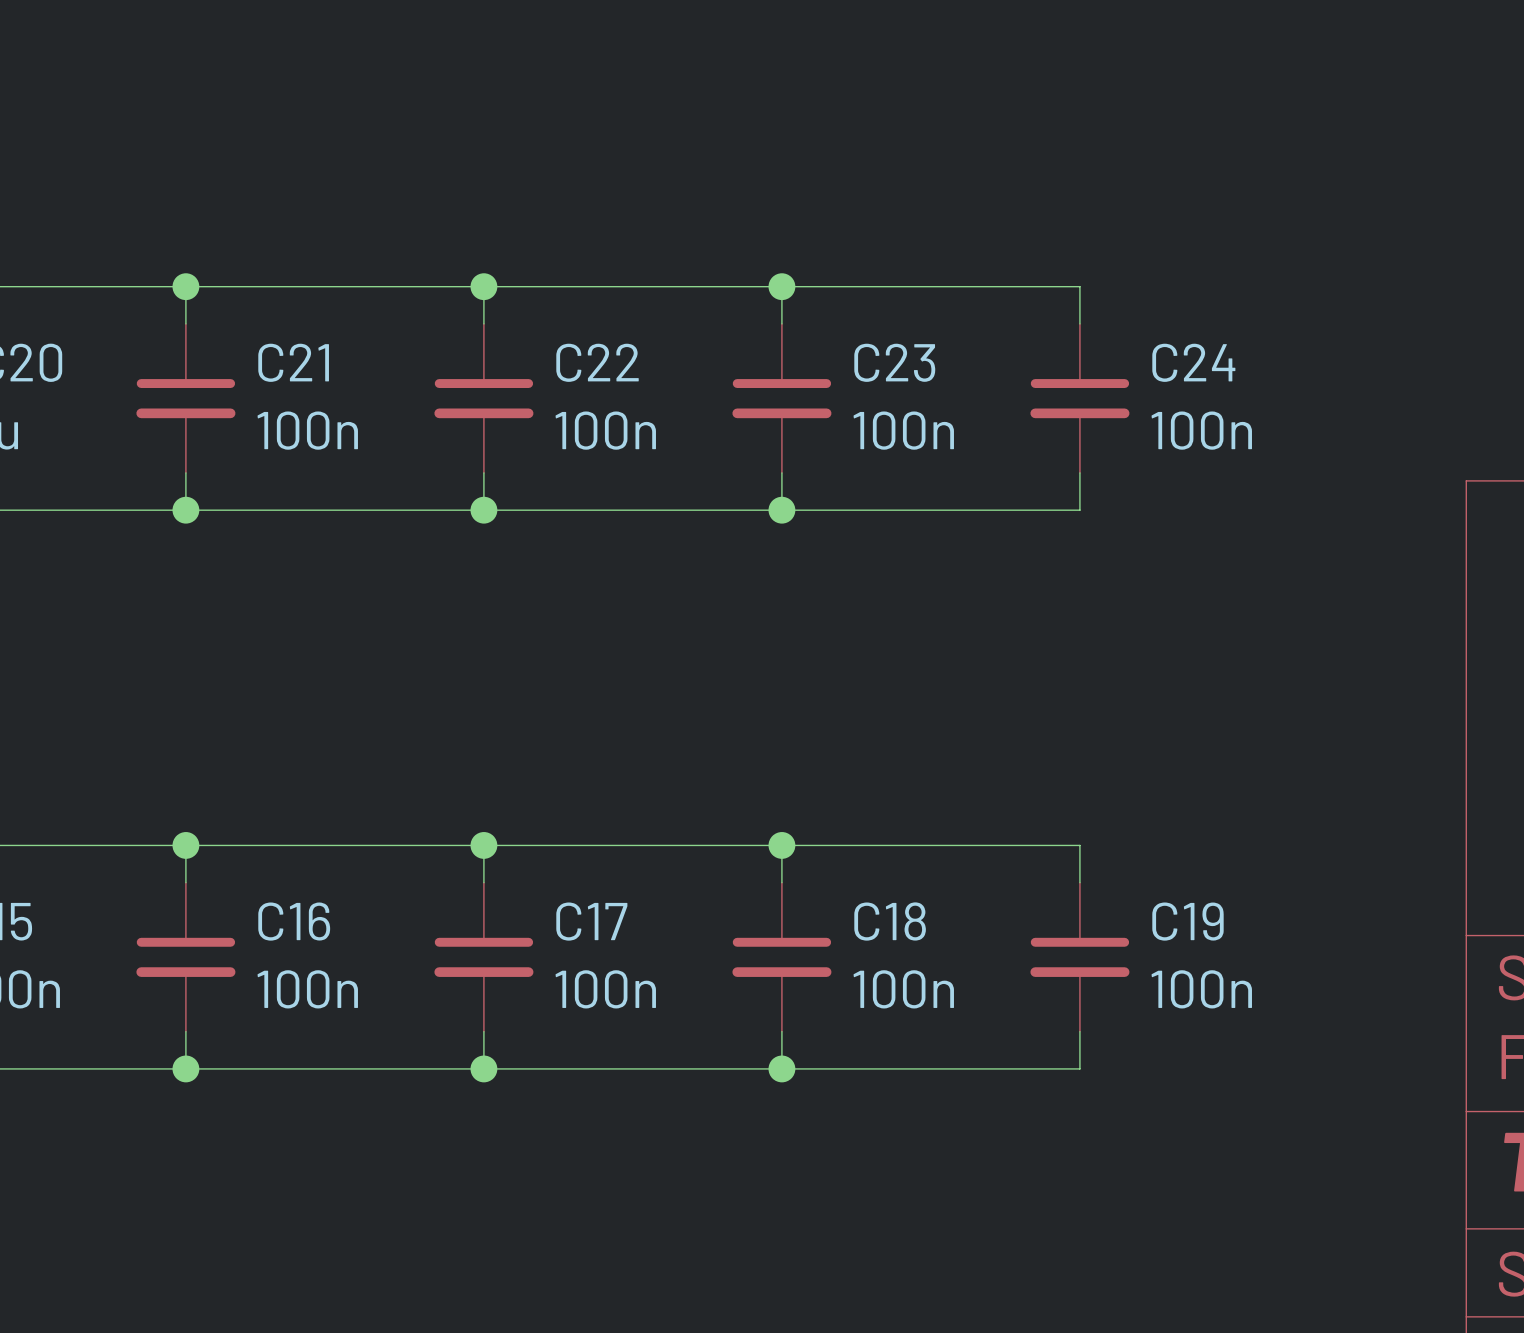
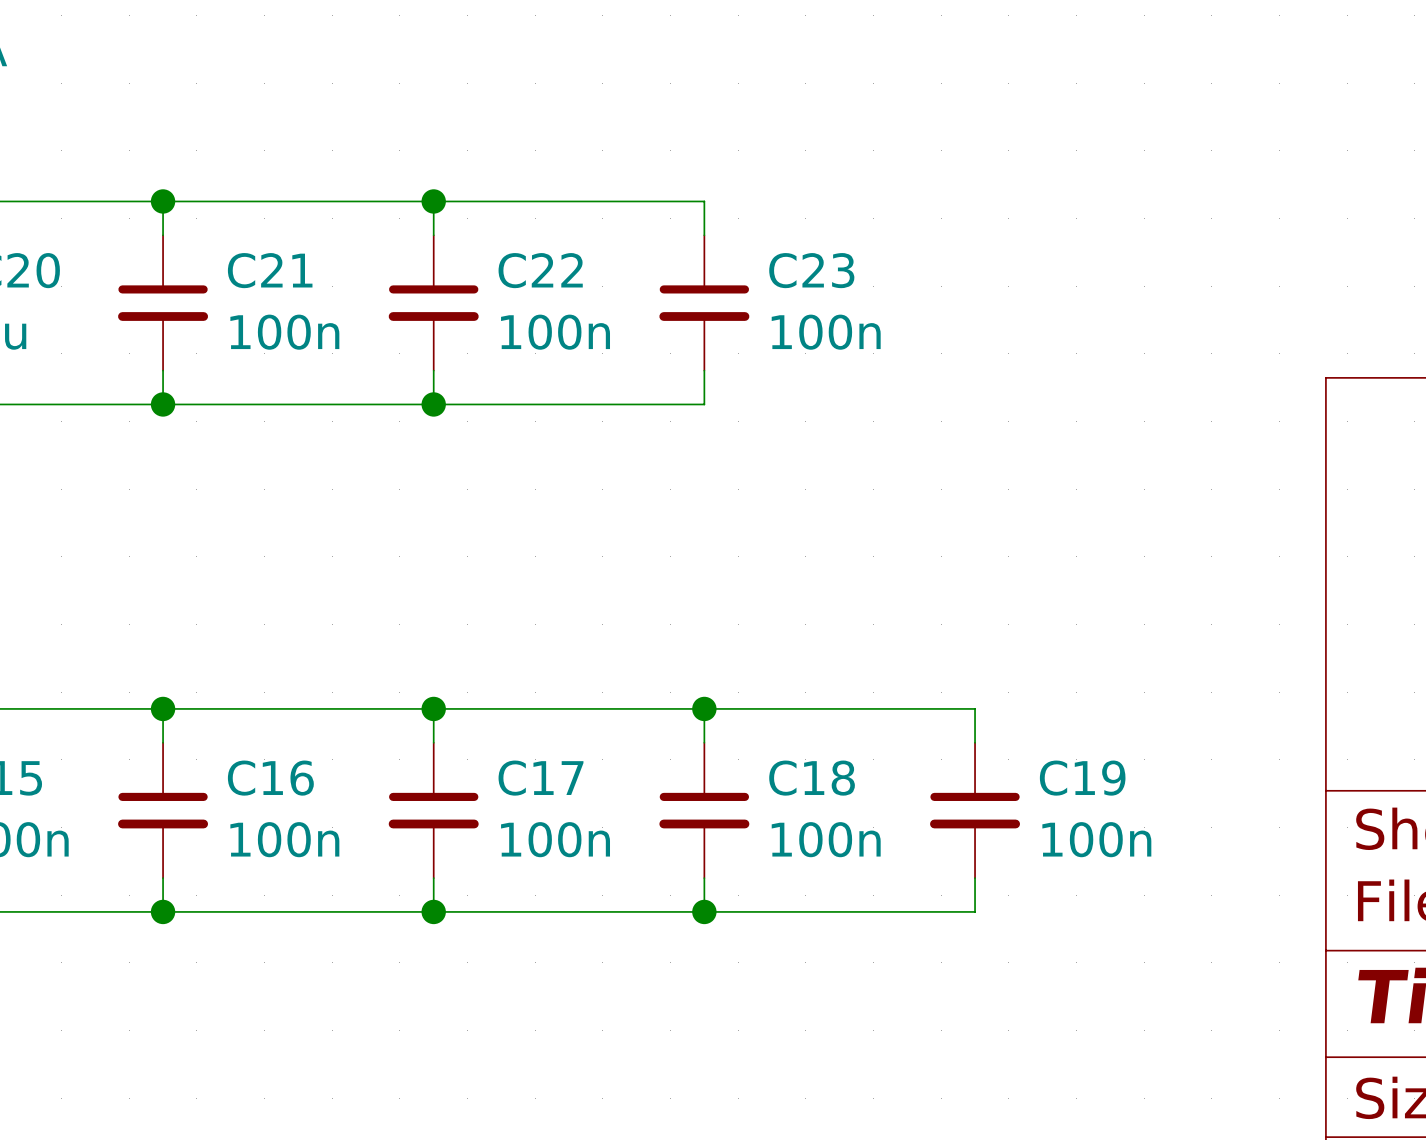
wire: (781, 286) (1079, 286) (1079, 323) -> none
junction: (781, 286) -> none
C24: 100n (1079, 398) -> none
wire: (1079, 472) (1079, 510) (781, 510) -> none
junction: (781, 510) -> none

